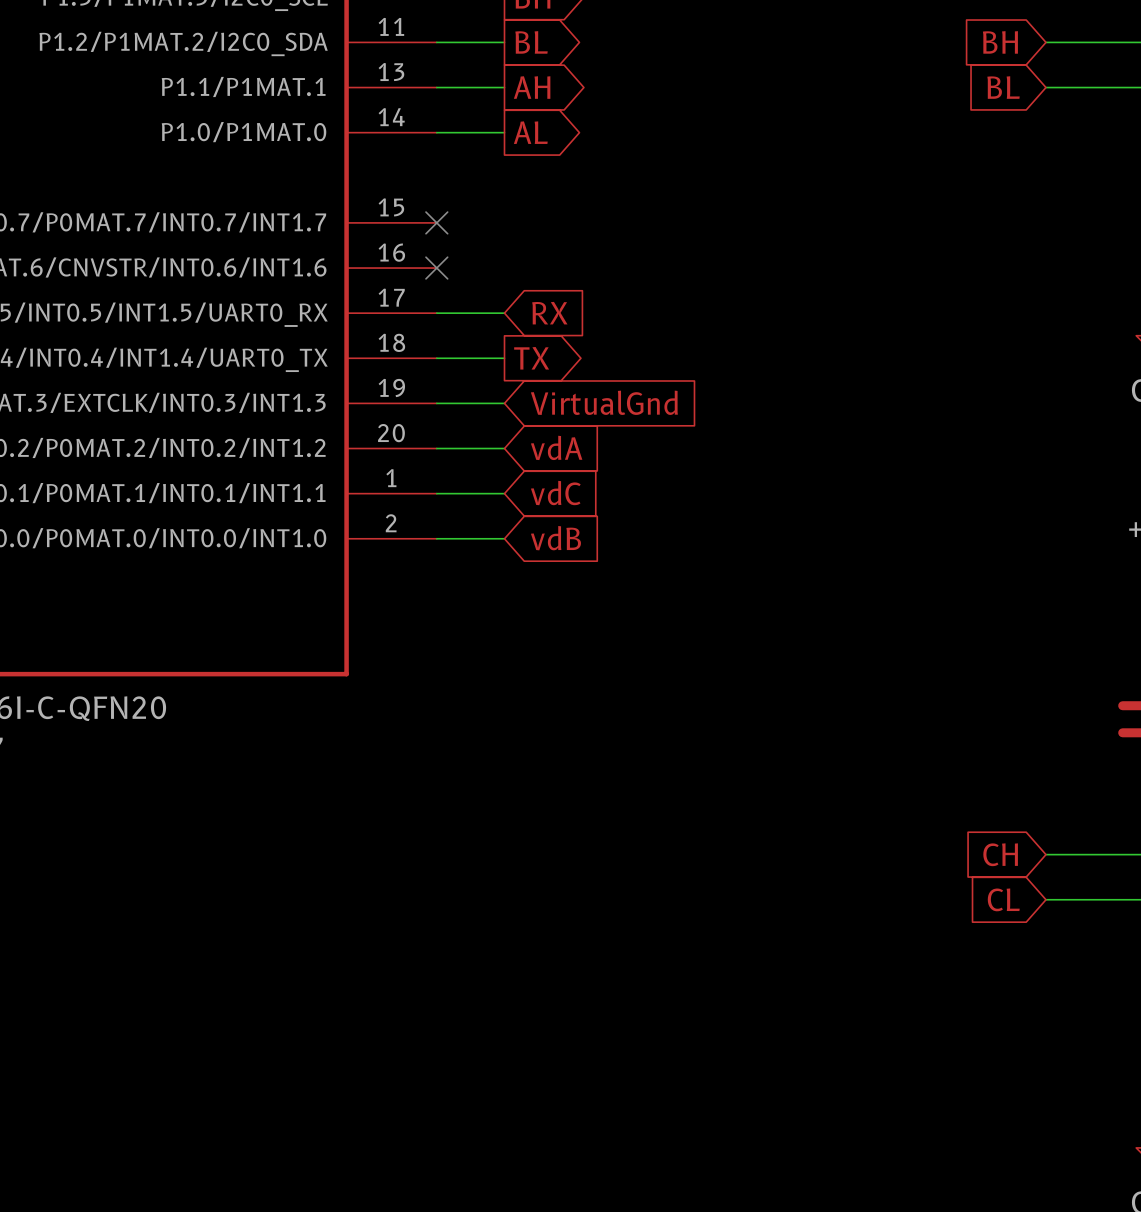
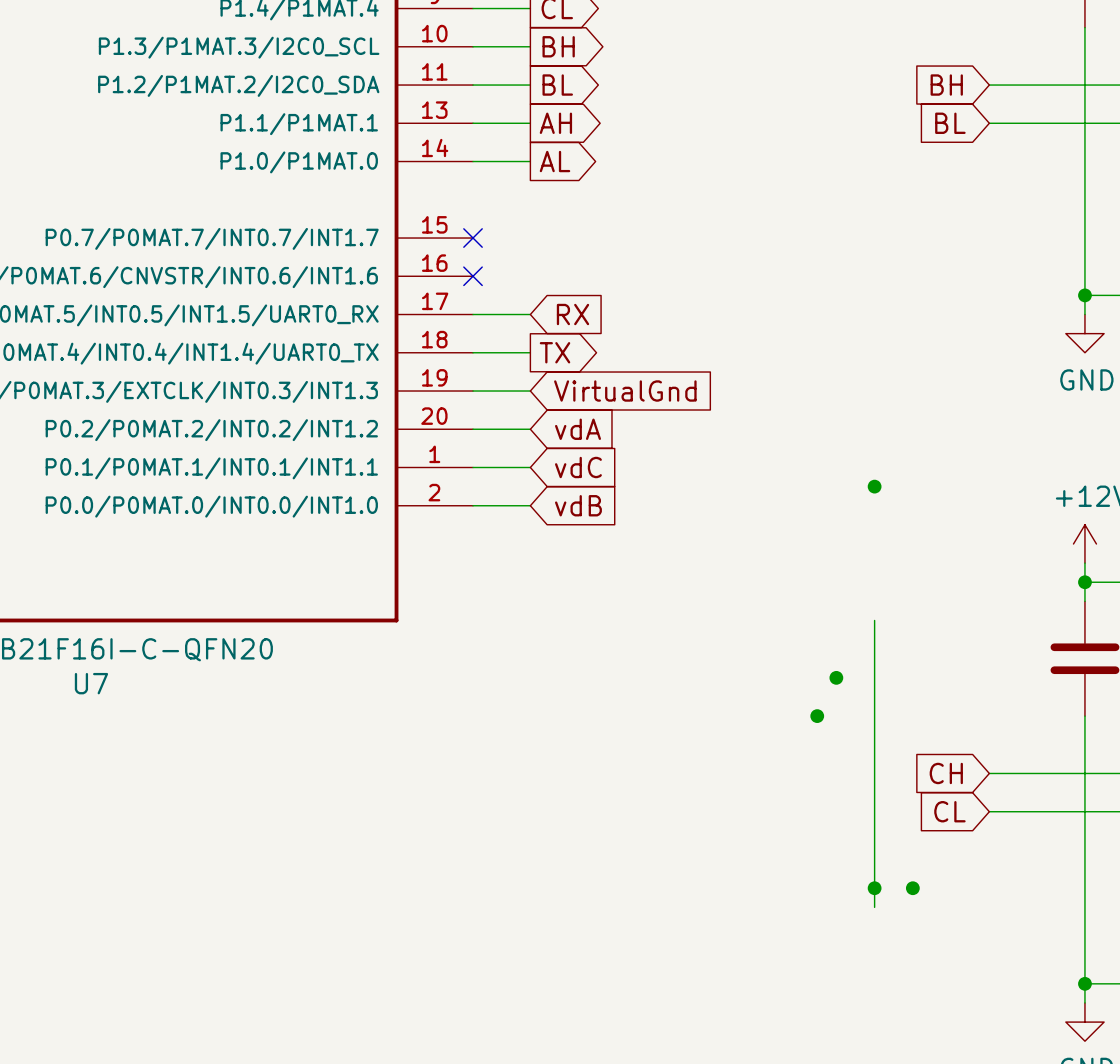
junction: none -> (874, 486)
wire: none -> (874, 620) (874, 907)
junction: none -> (836, 677)
junction: none -> (817, 716)
junction: none -> (874, 888)
junction: none -> (912, 888)

